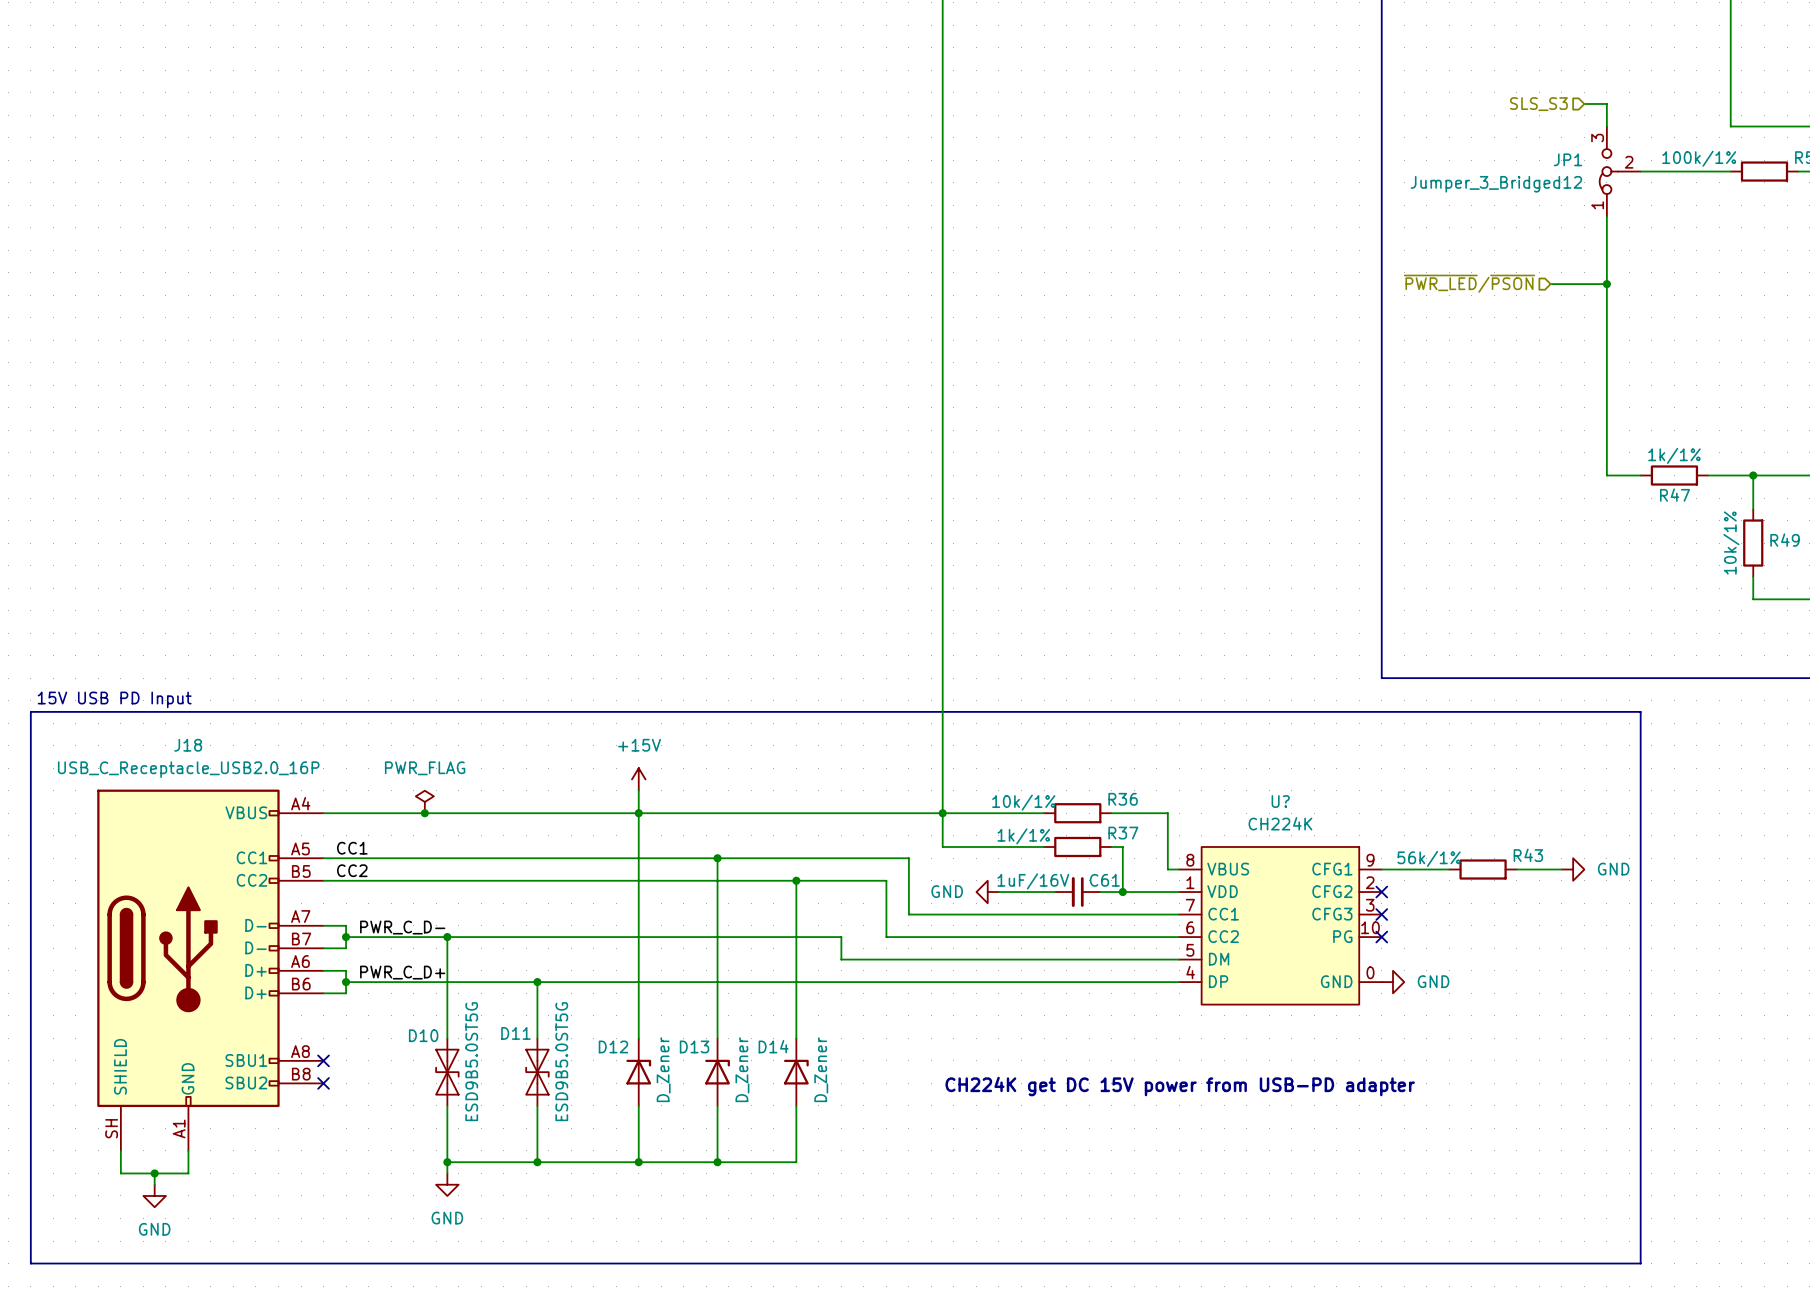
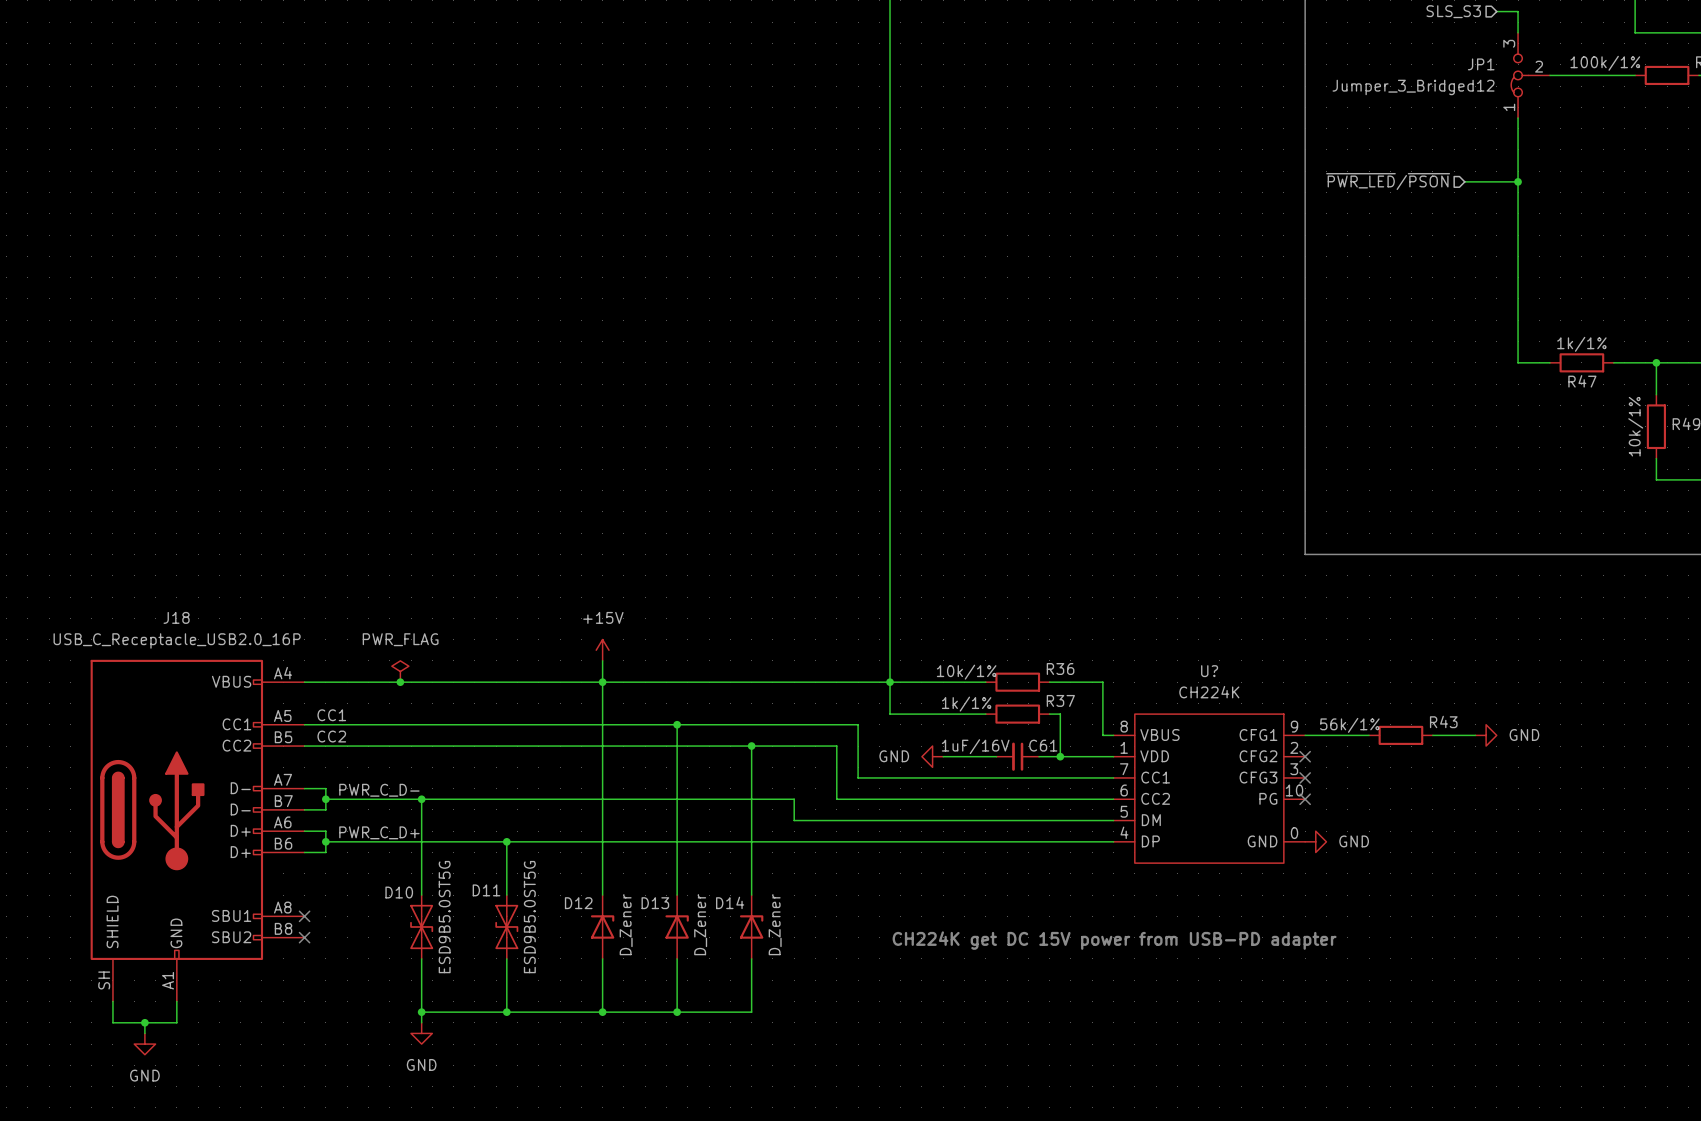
text: 15V USB PD Input (114, 699) -> none
line: (30, 711) (1640, 711) (1640, 1263) (30, 1263) (30, 711) -> none

